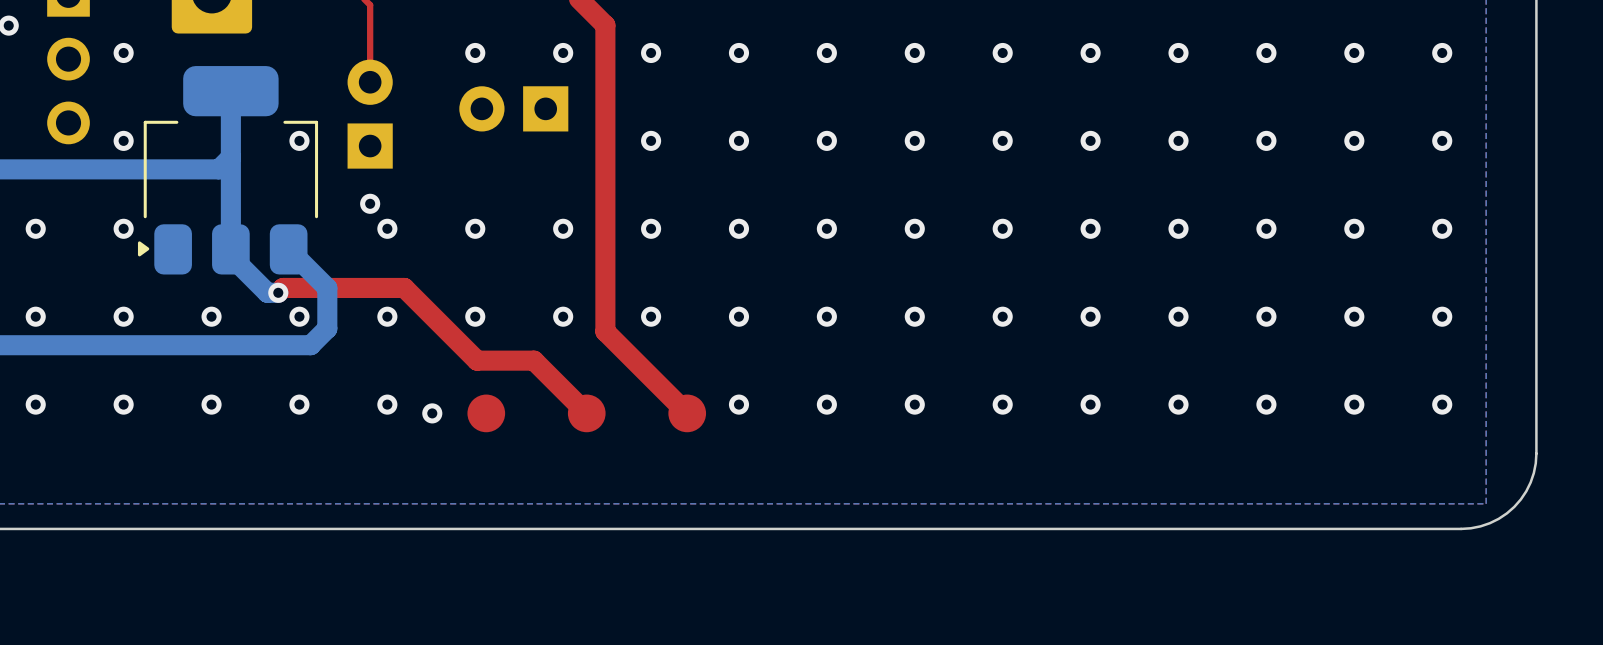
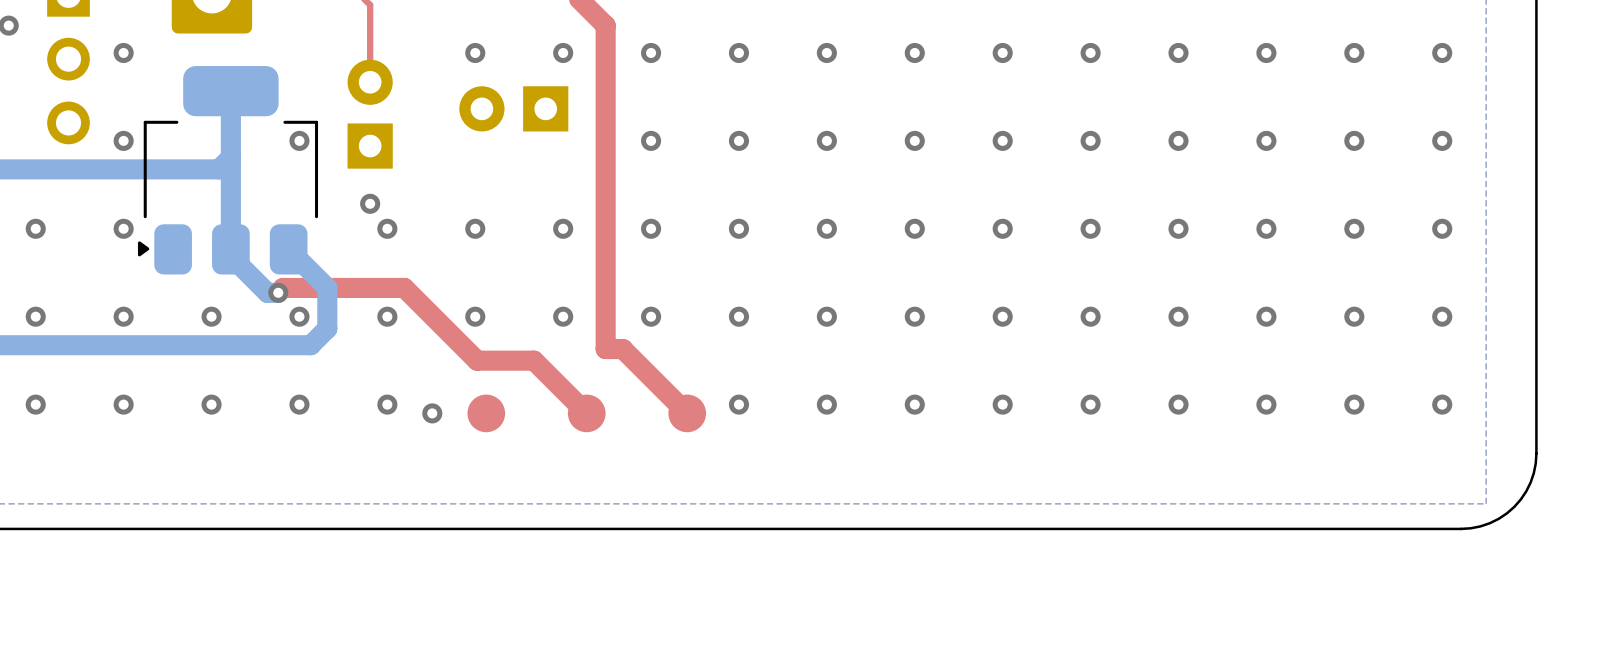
top track: (605, 25) (605, 331) (622, 349) -> (605, 25) (605, 349) (622, 349)

